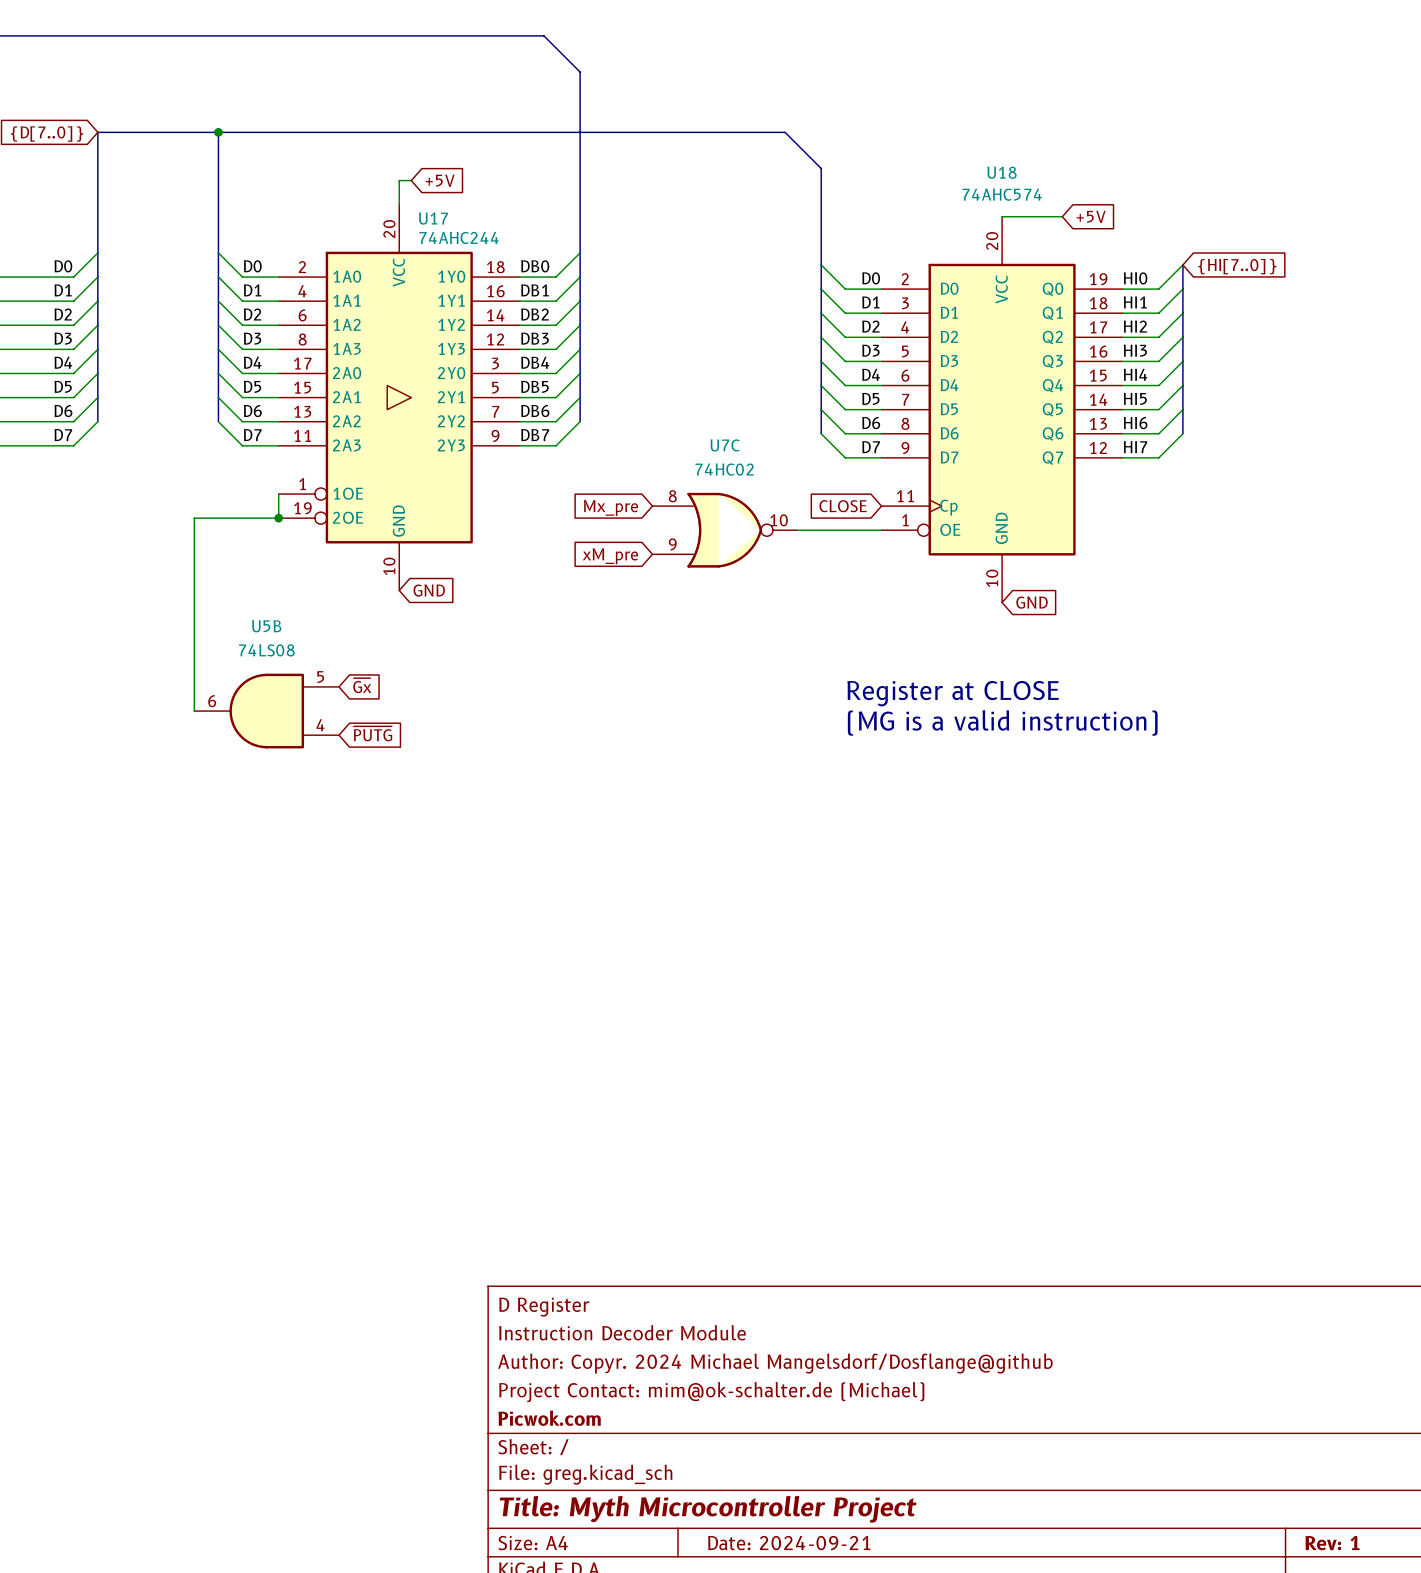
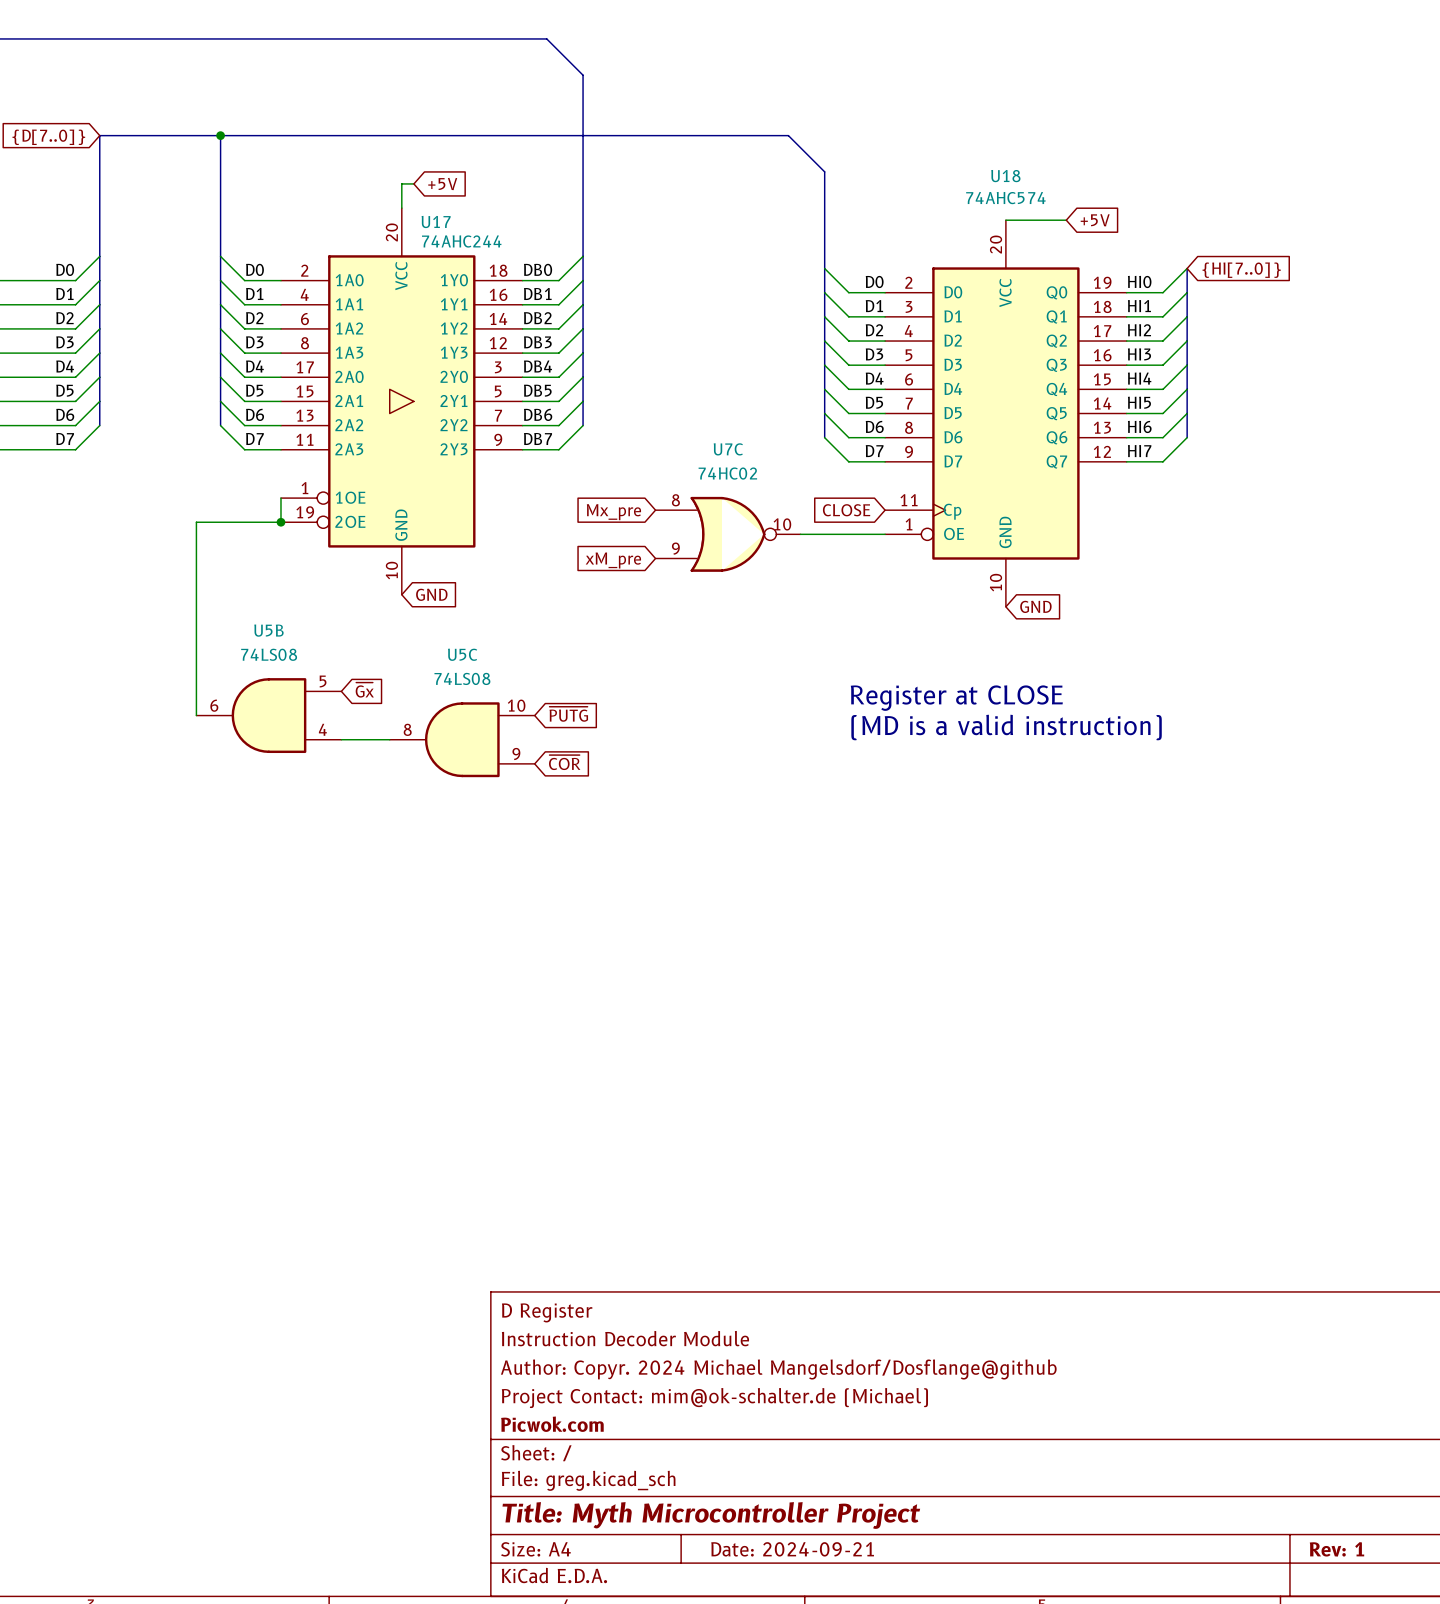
text: (MG is a valid instruction) (1002, 722) -> (MD is a valid instruction) (1006, 727)
global label position: ~{PUTG} (372, 733) -> ~{PUTG} (568, 714)
wire: none -> (341, 739) (389, 739)
U5C: none -> 74LS08 (462, 739)
global label: none -> ~{COR} (564, 762)

